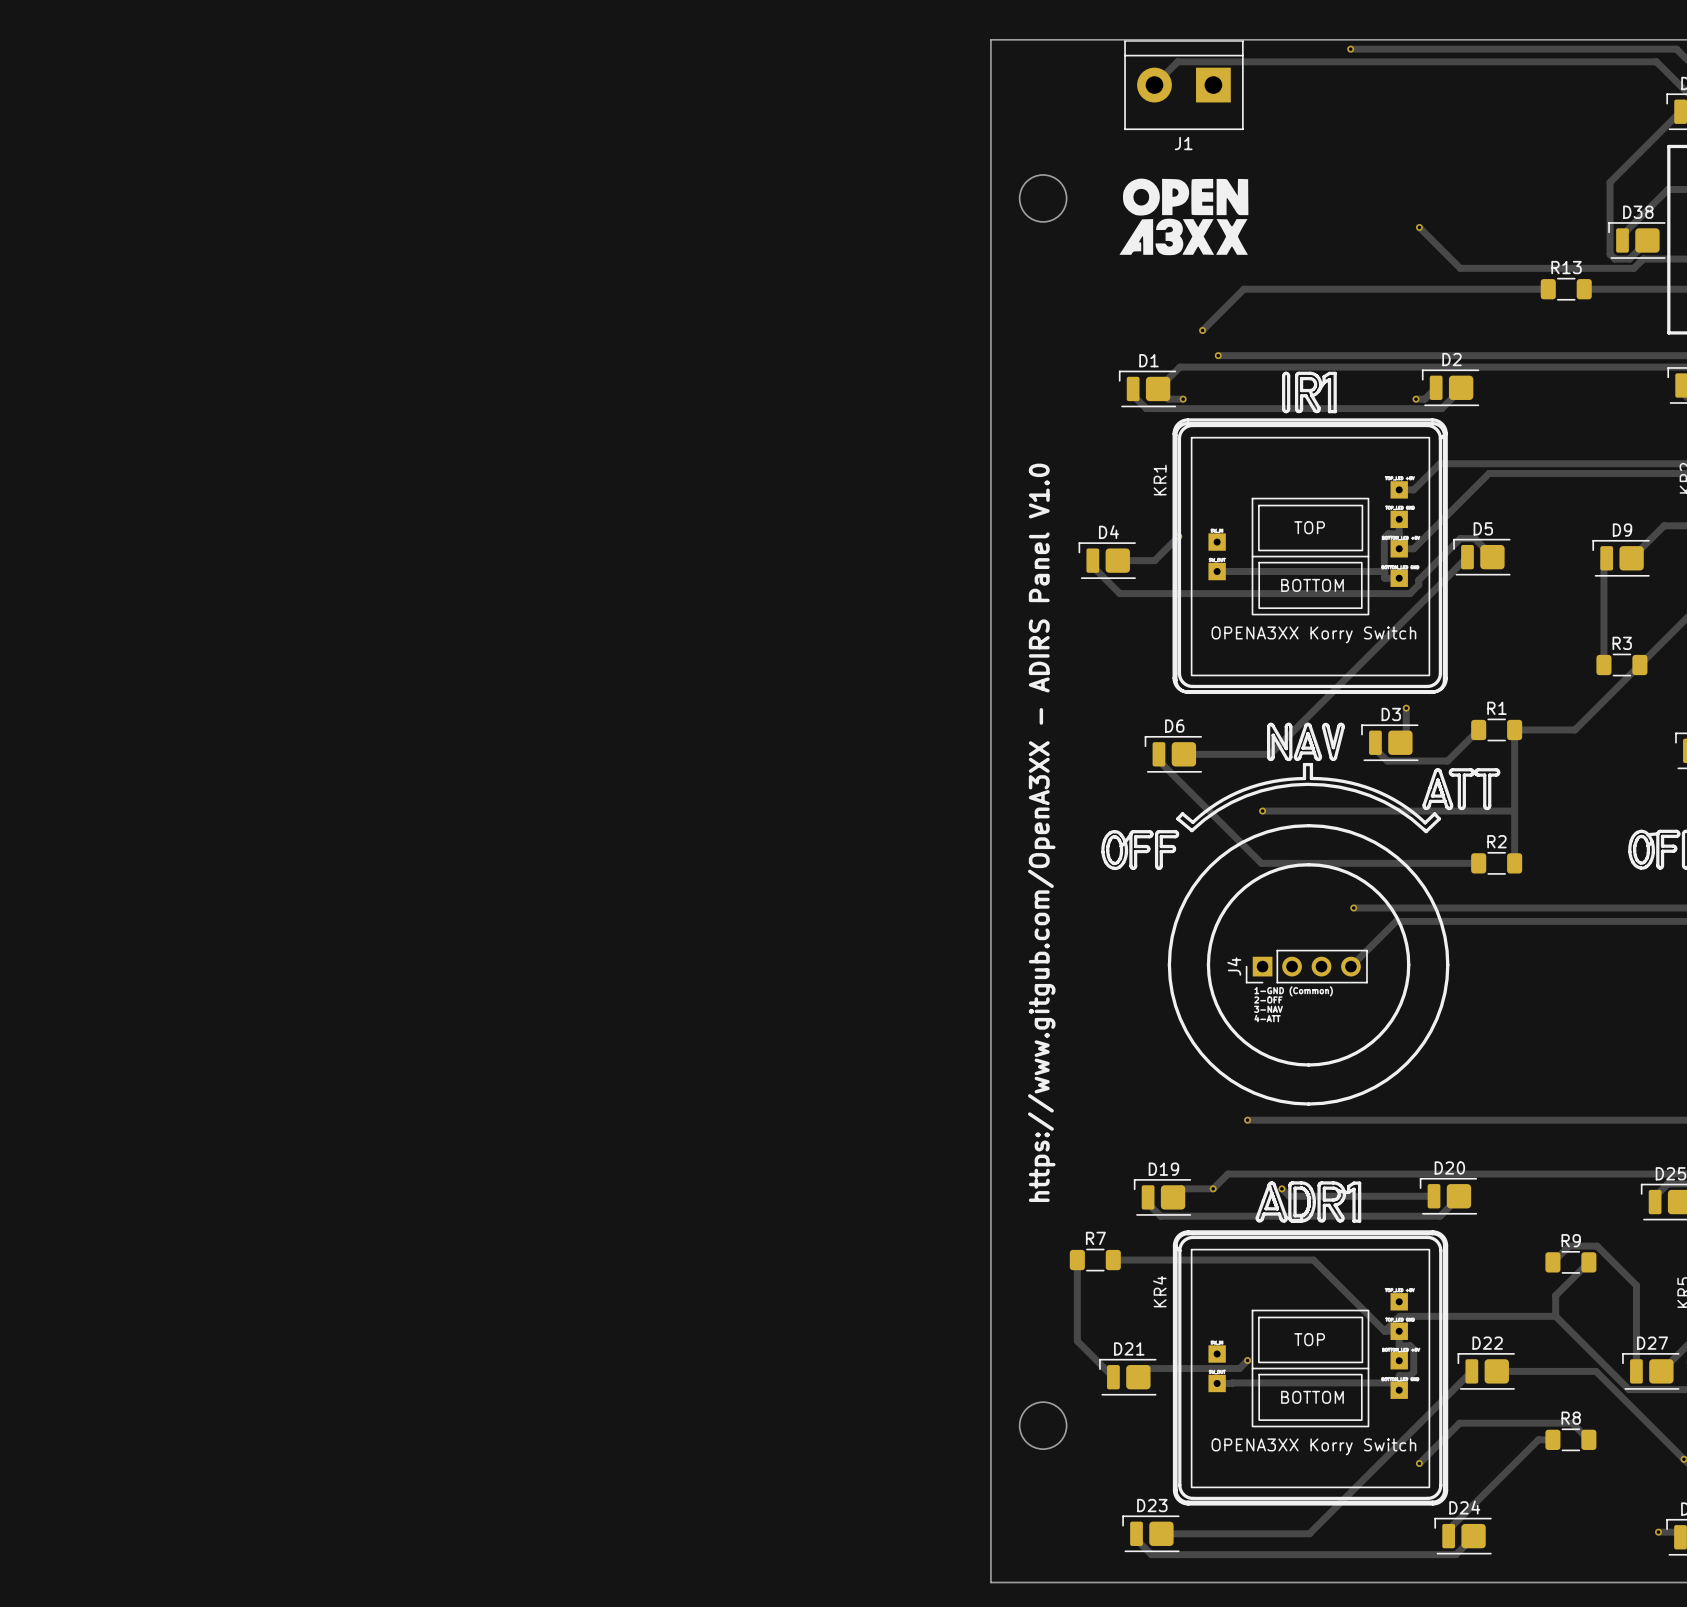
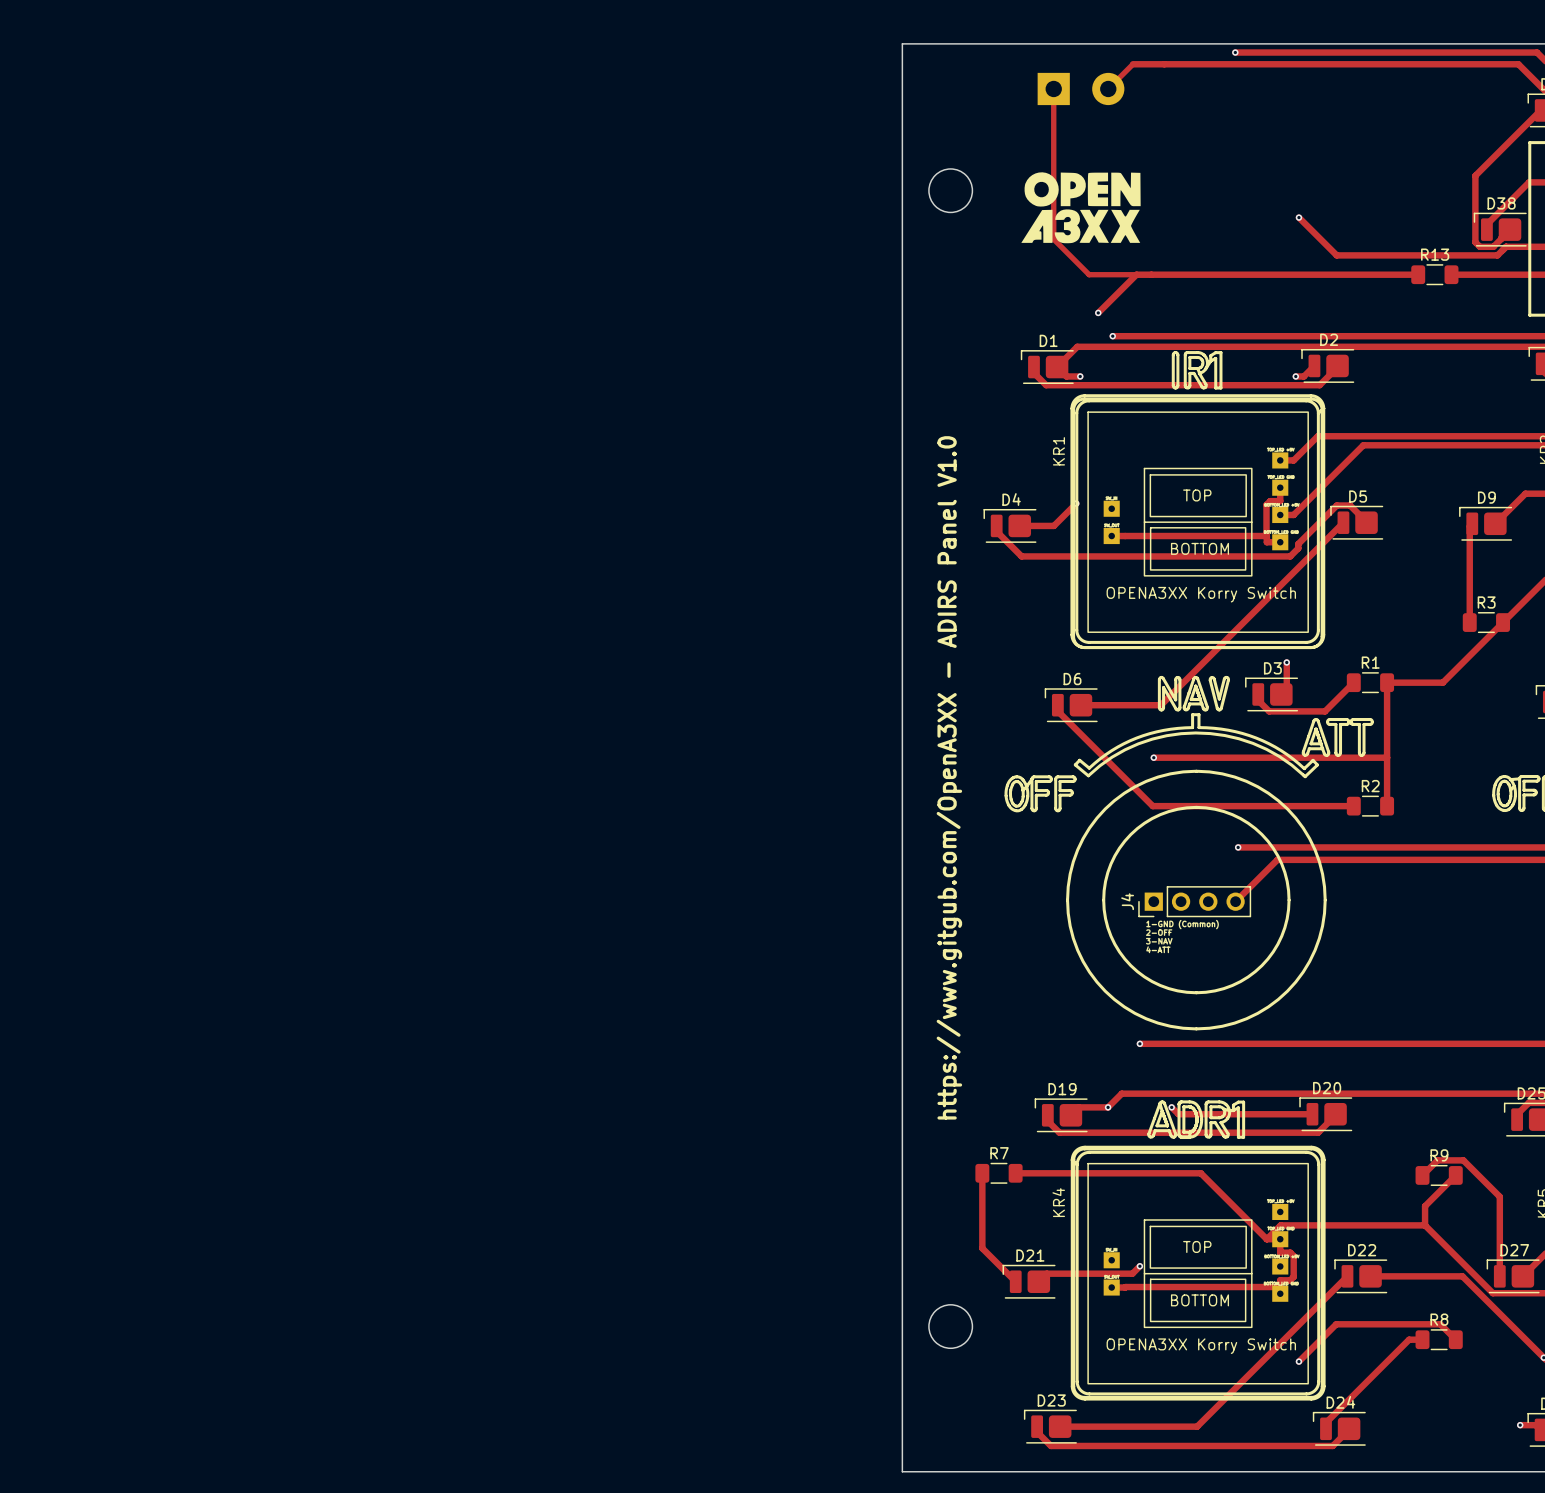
track: (1240, 61) (1177, 61) (1154, 85) -> (1132, 64) (1108, 88)
J1 side: top (1183, 85) -> bottom (1081, 88)
track: none -> (1053, 88) (1052, 238) (1089, 274) (1151, 274)

